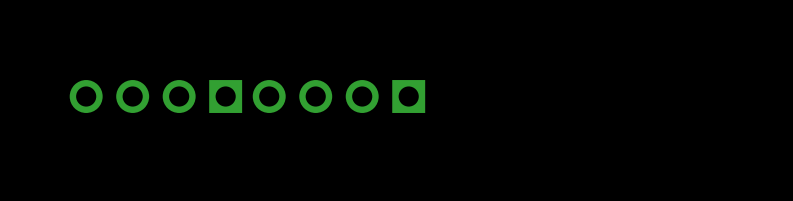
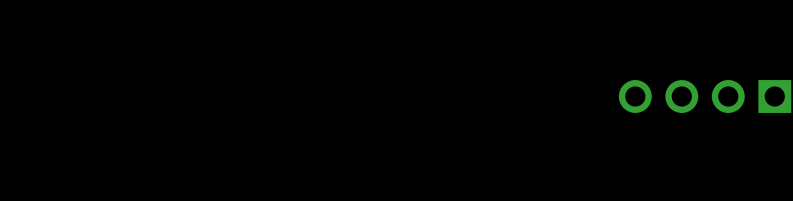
part: (155, 96) -> none
part: (338, 96) -> none
part: none -> (705, 96)

